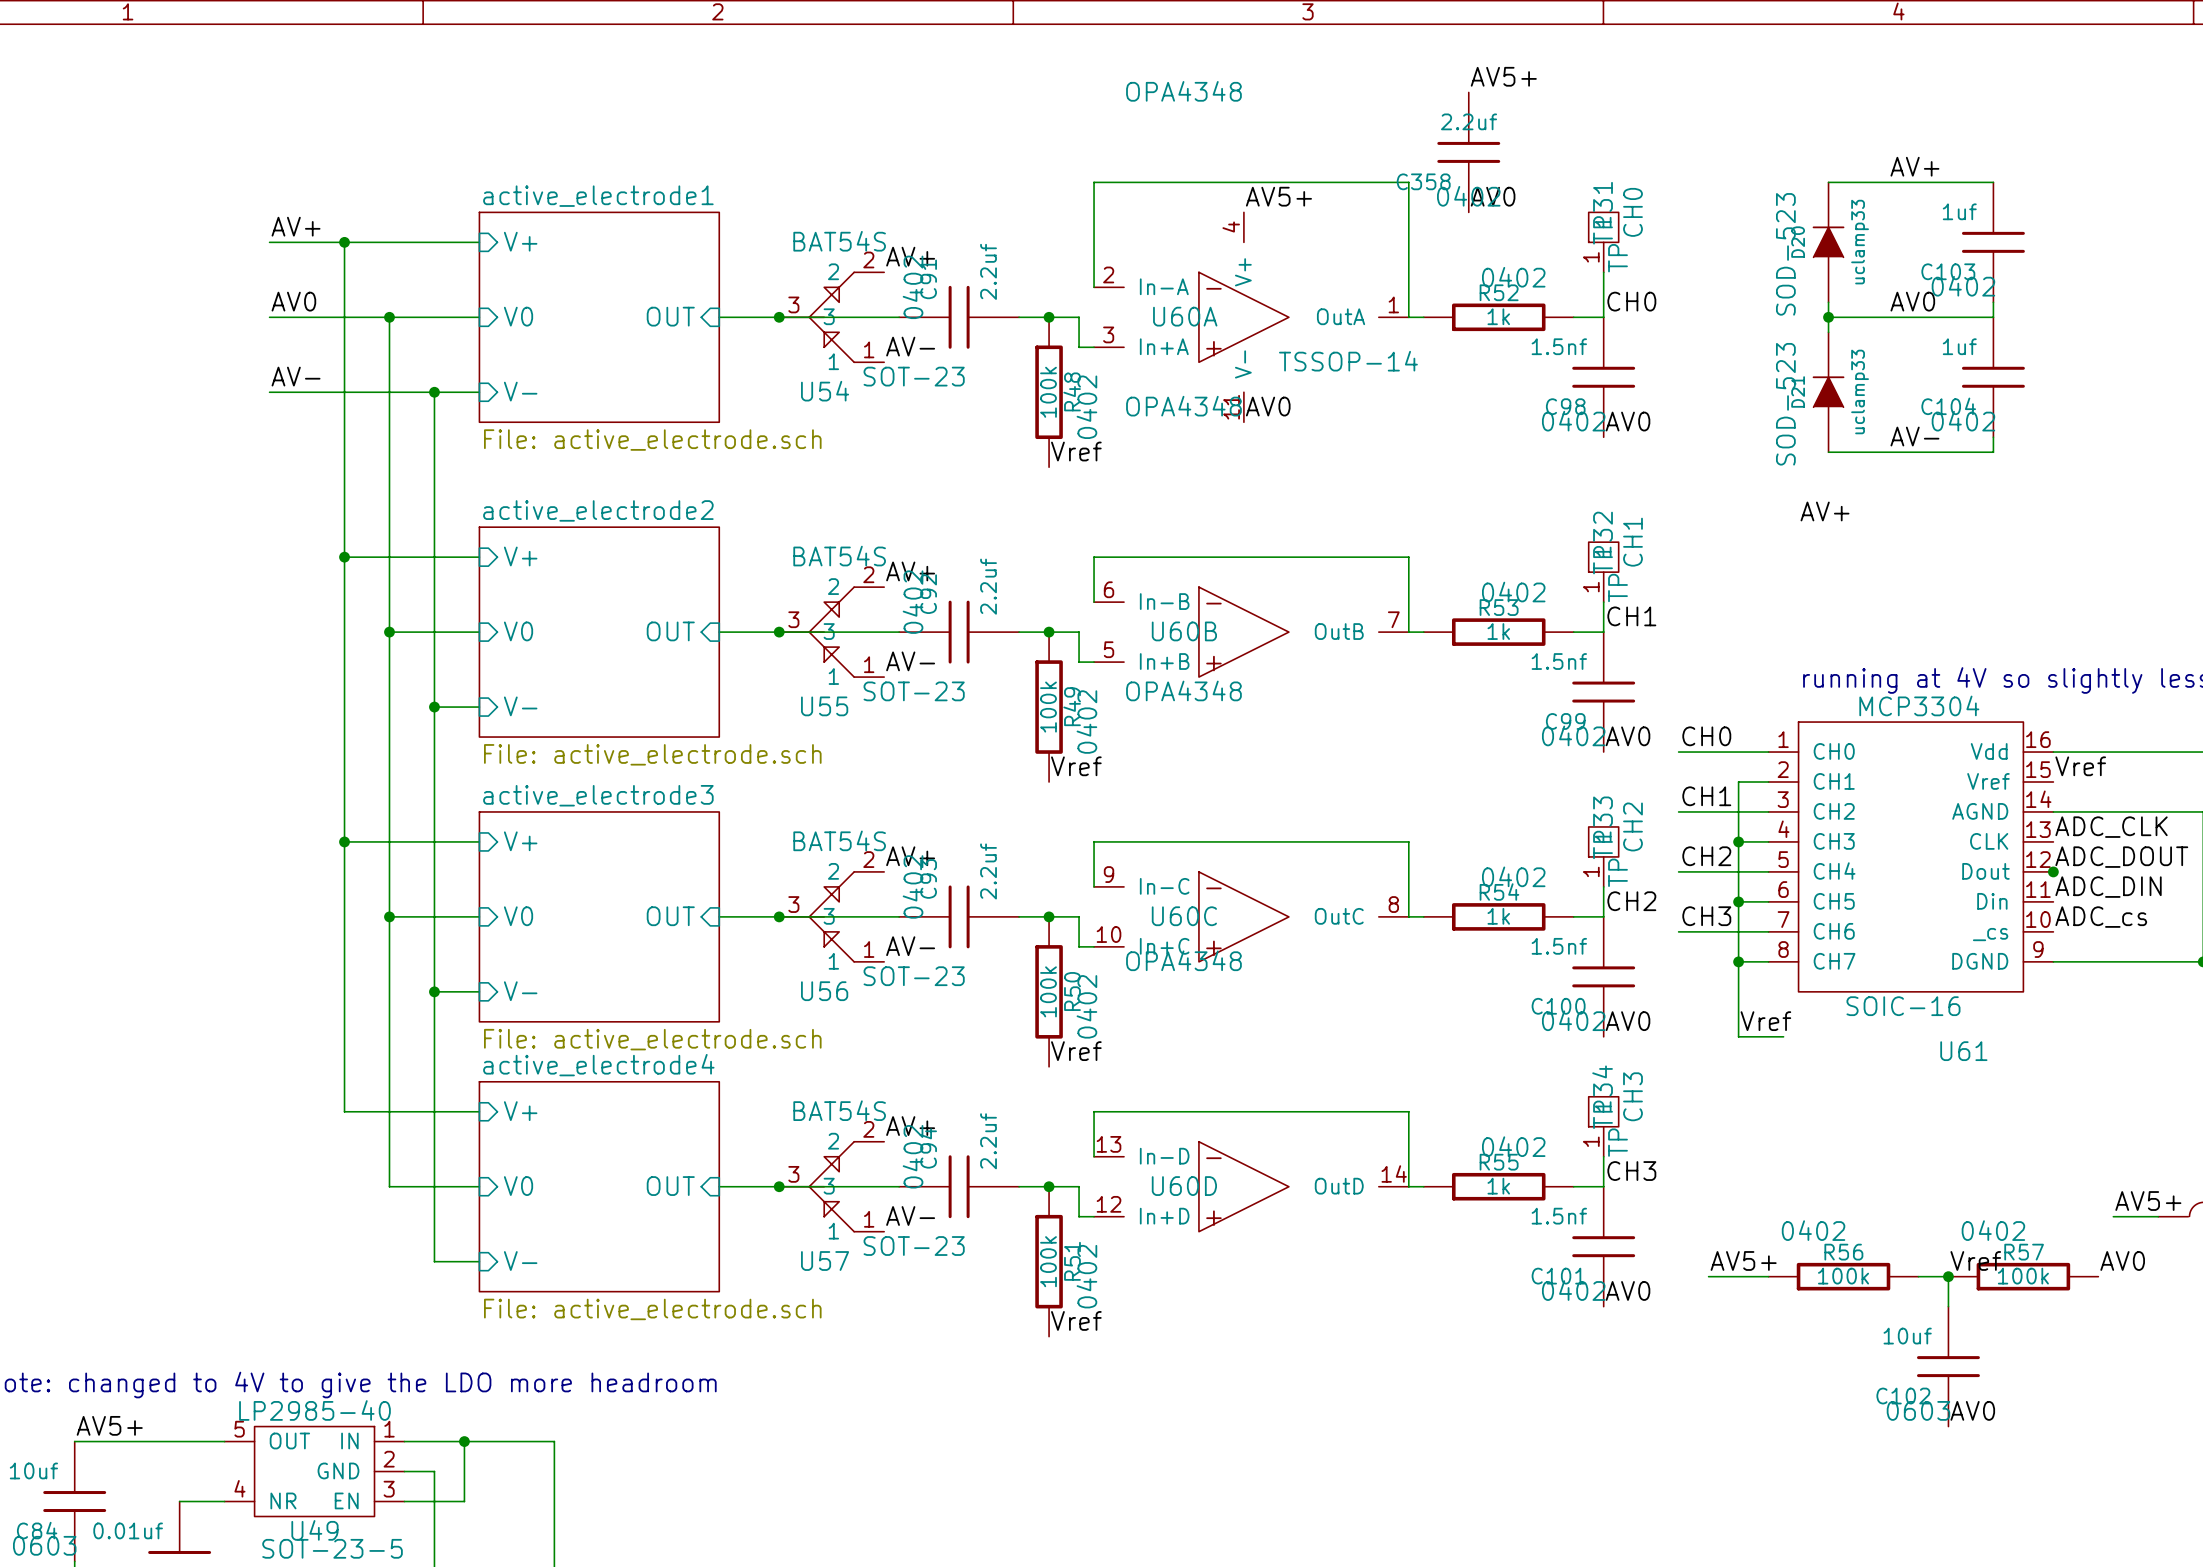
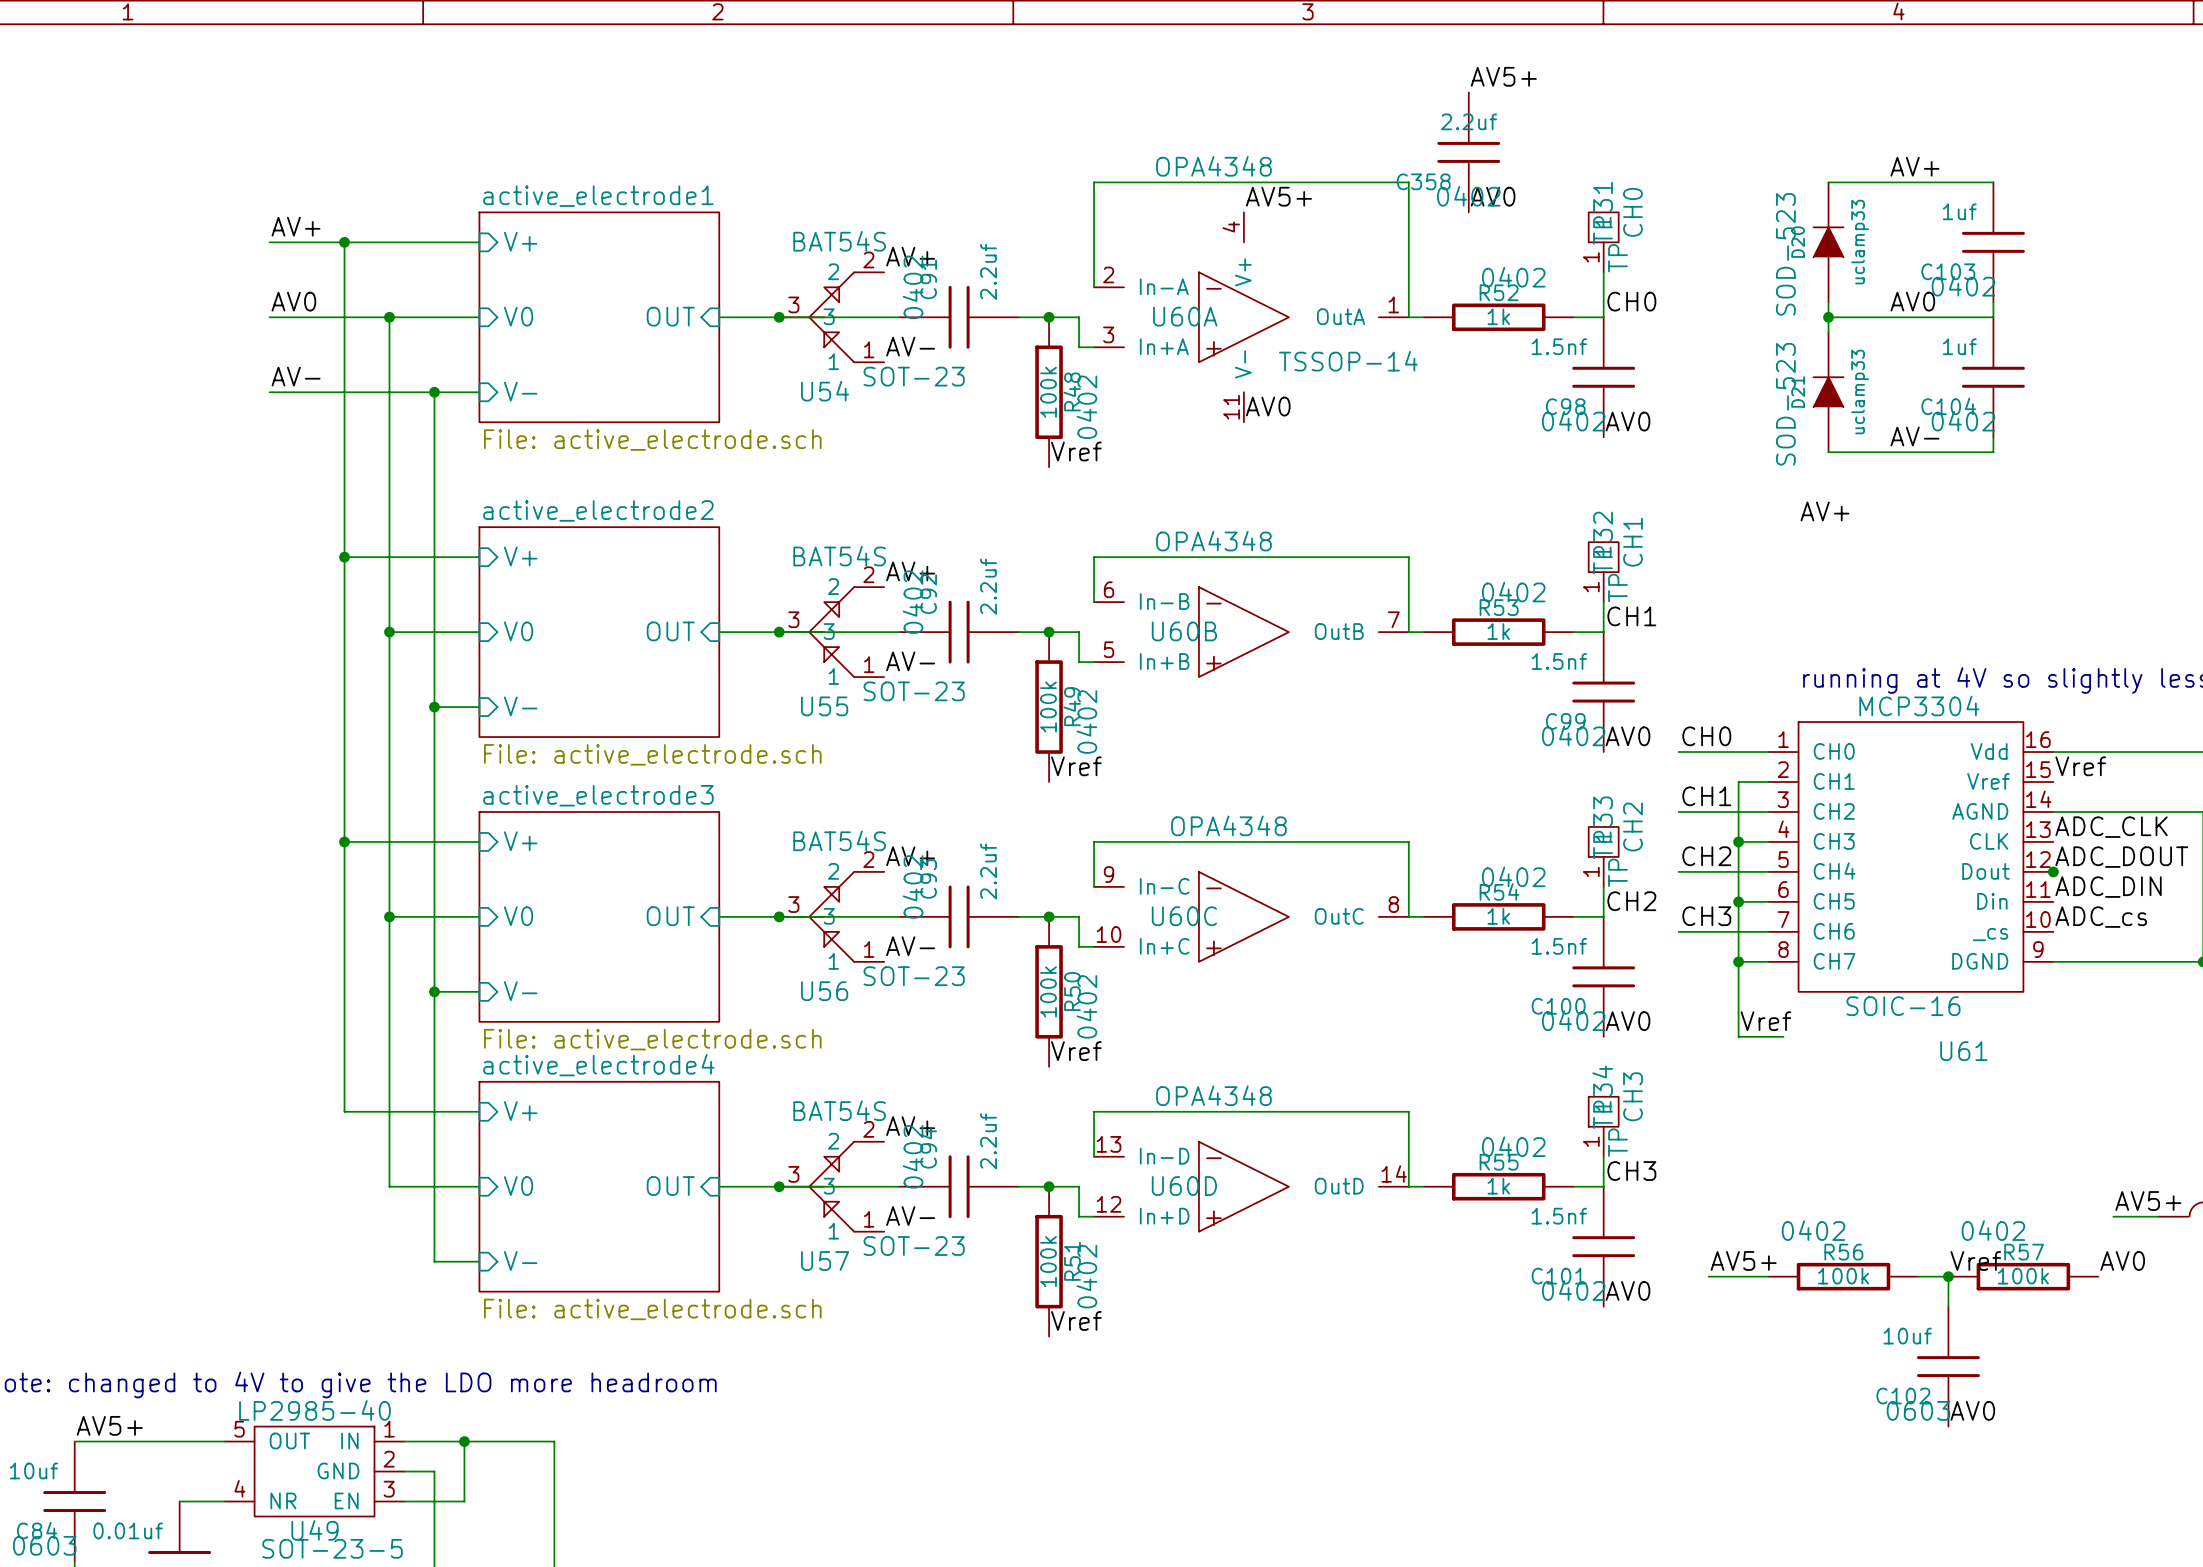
U60A value position: OPA4348 (1183, 91) -> OPA4348 (1213, 166)
U60B value position: OPA4348 (1183, 406) -> OPA4348 (1213, 541)
U60C value position: OPA4348 (1183, 690) -> OPA4348 (1228, 825)
U60D value position: OPA4348 (1183, 960) -> OPA4348 (1213, 1095)

